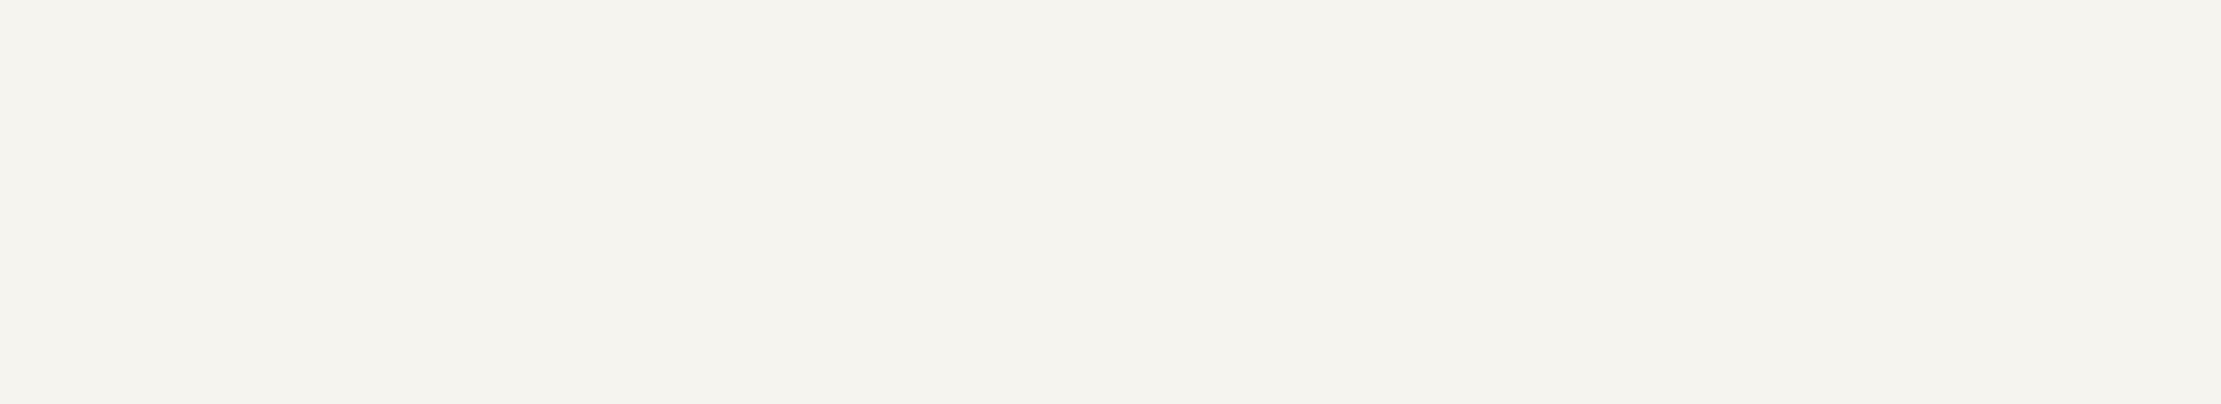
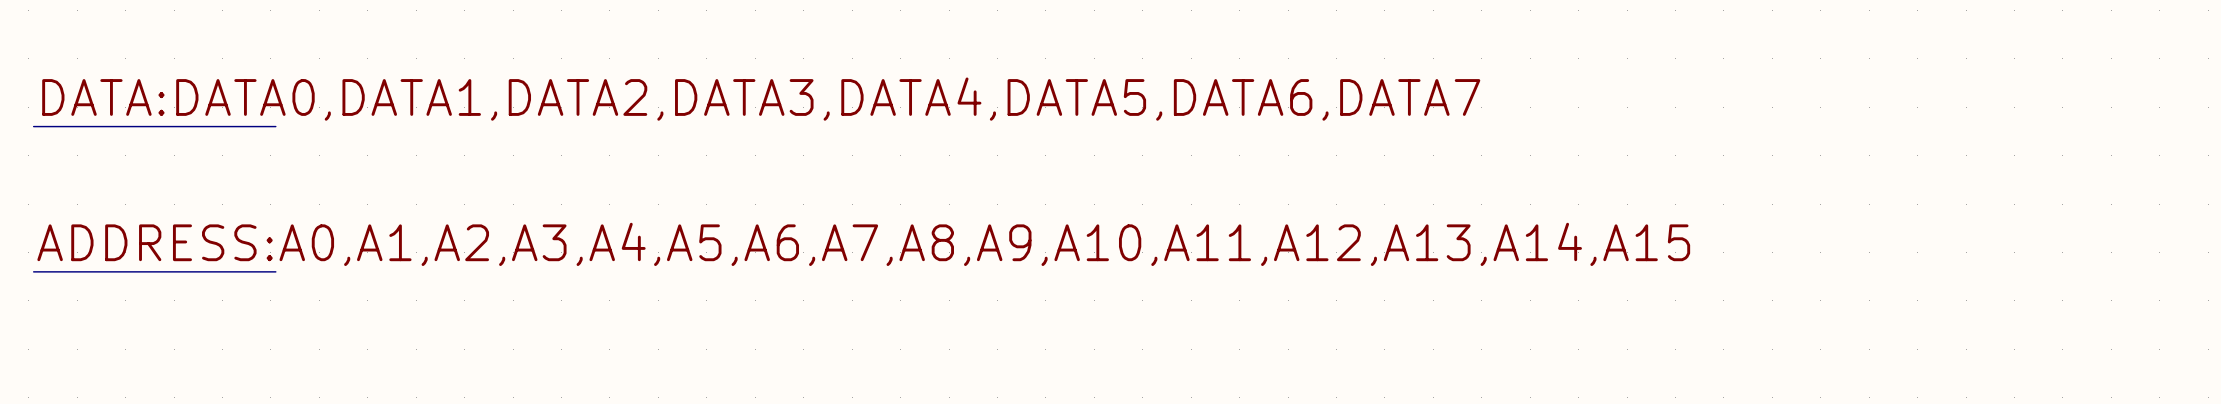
label: none -> DATA:DATA0,DATA1,DATA2,DATA3,DATA4,DATA5,DATA6,DATA7 (761, 99)
bus: none -> (33, 126) (275, 126)
label: none -> ADDRESS:A0,A1,A2,A3,A4,A5,A6,A7,A8,A9,A10,A11,A12,A13,A14,A15 (863, 244)
bus: none -> (33, 271) (275, 271)

